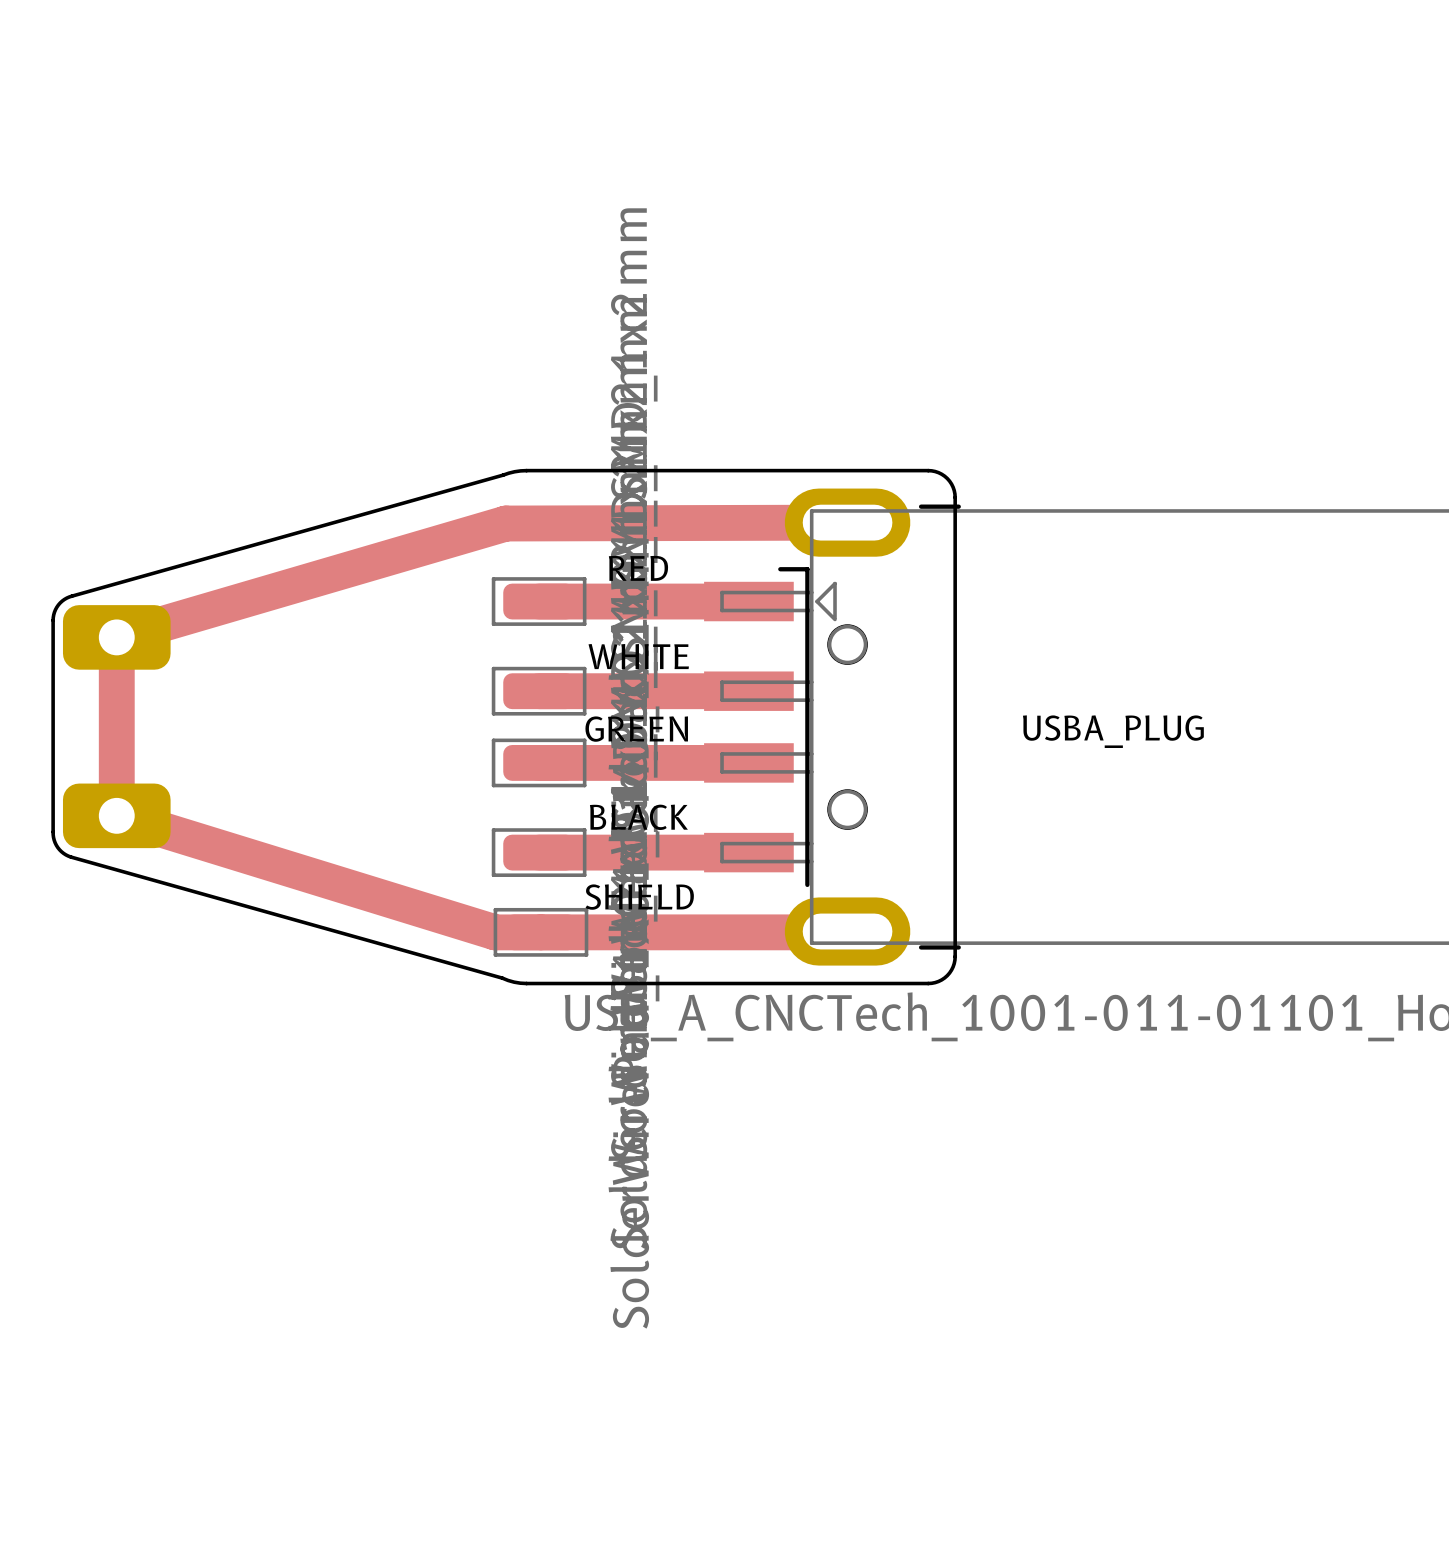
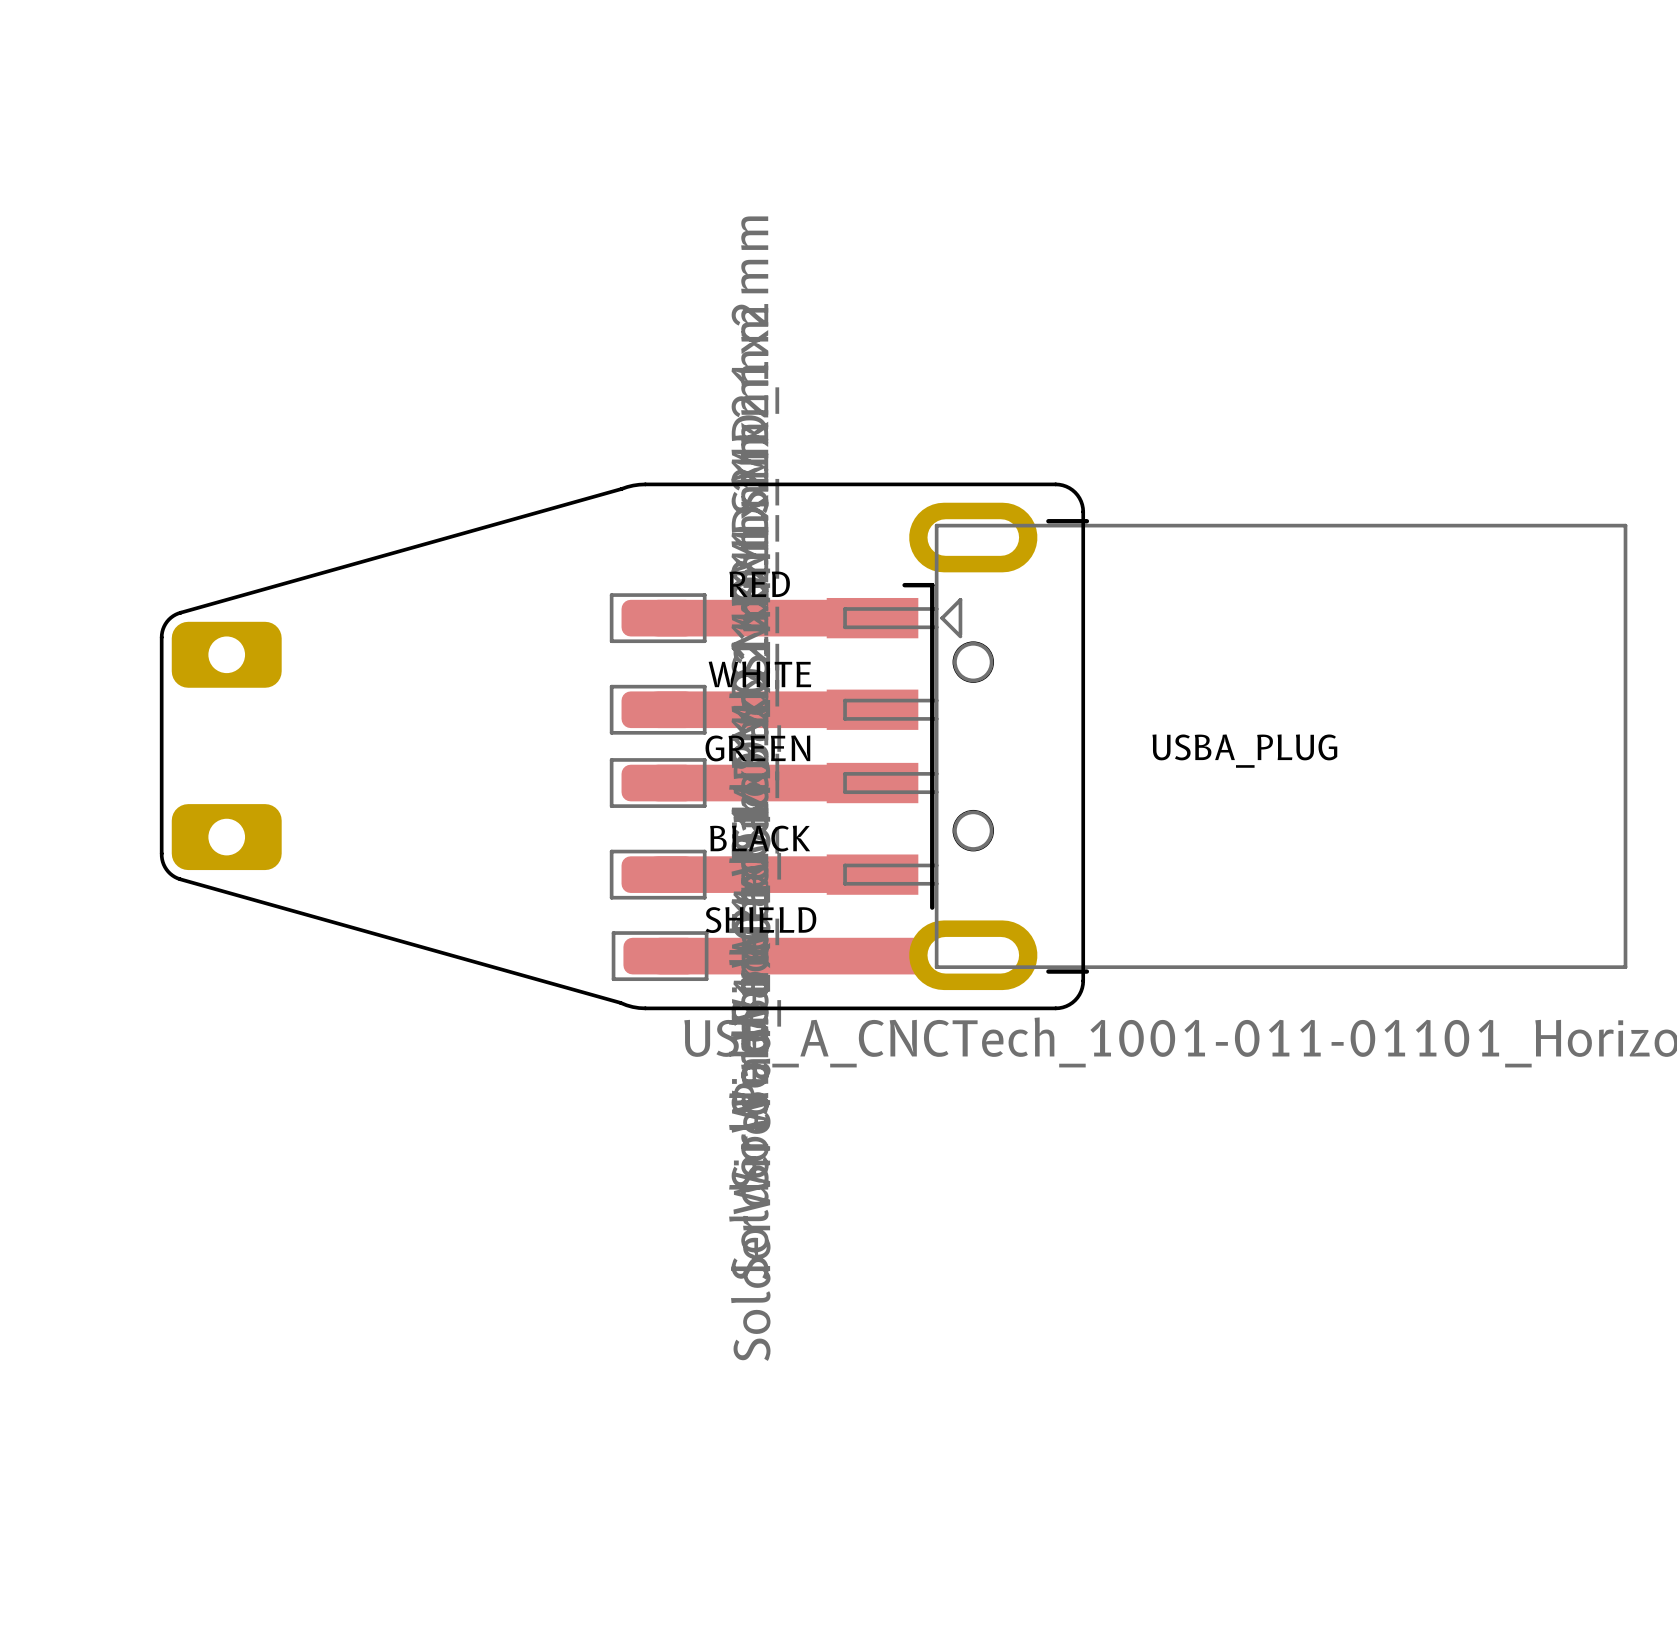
track: (847, 522) (505, 523) (116, 637) (116, 815) (495, 932) (540, 932) -> none

